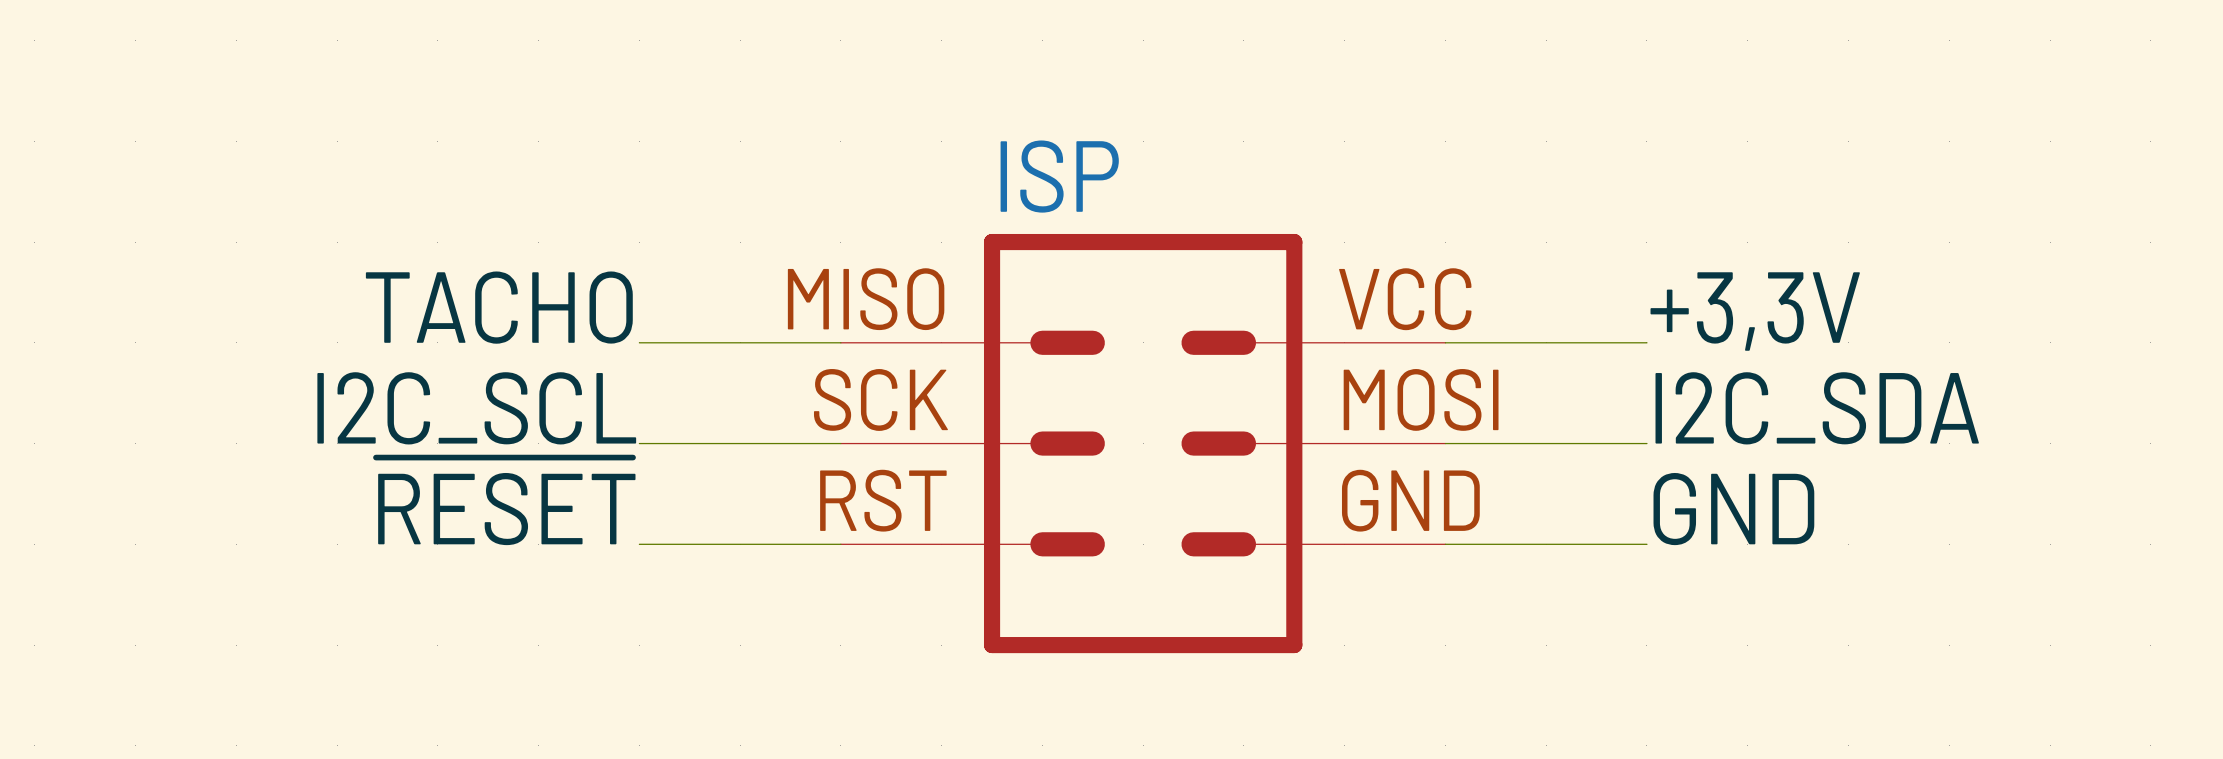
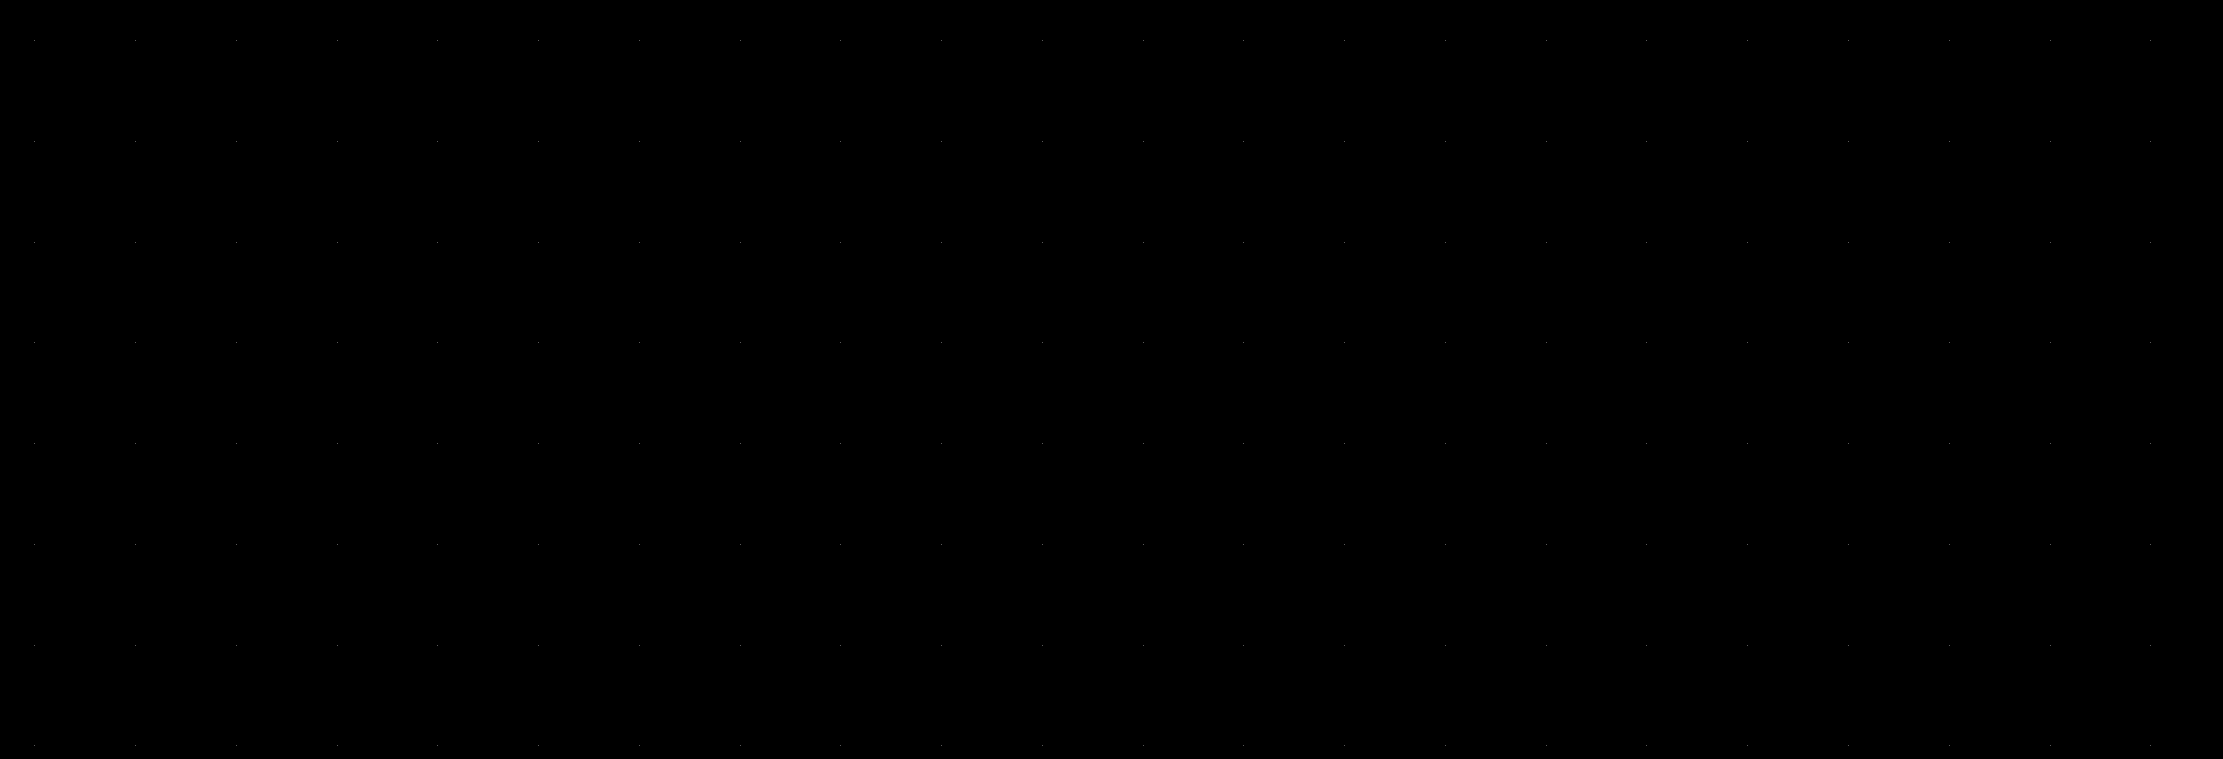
label: TACHO (499, 307) -> none
label: +3,3V (1755, 311) -> none
wire: (639, 342) (840, 342) -> none
wire: (1445, 342) (1646, 342) -> none
label: I2C_SCL (476, 408) -> none
label: I2C_SDA (1817, 408) -> none
wire: (639, 443) (840, 443) -> none
ISP: (1143, 443) -> none
wire: (1445, 443) (1646, 443) -> none
label: ~{RESET} (505, 501) -> none
label: GND (1733, 509) -> none
wire: (639, 544) (840, 544) -> none
wire: (1445, 544) (1646, 544) -> none

